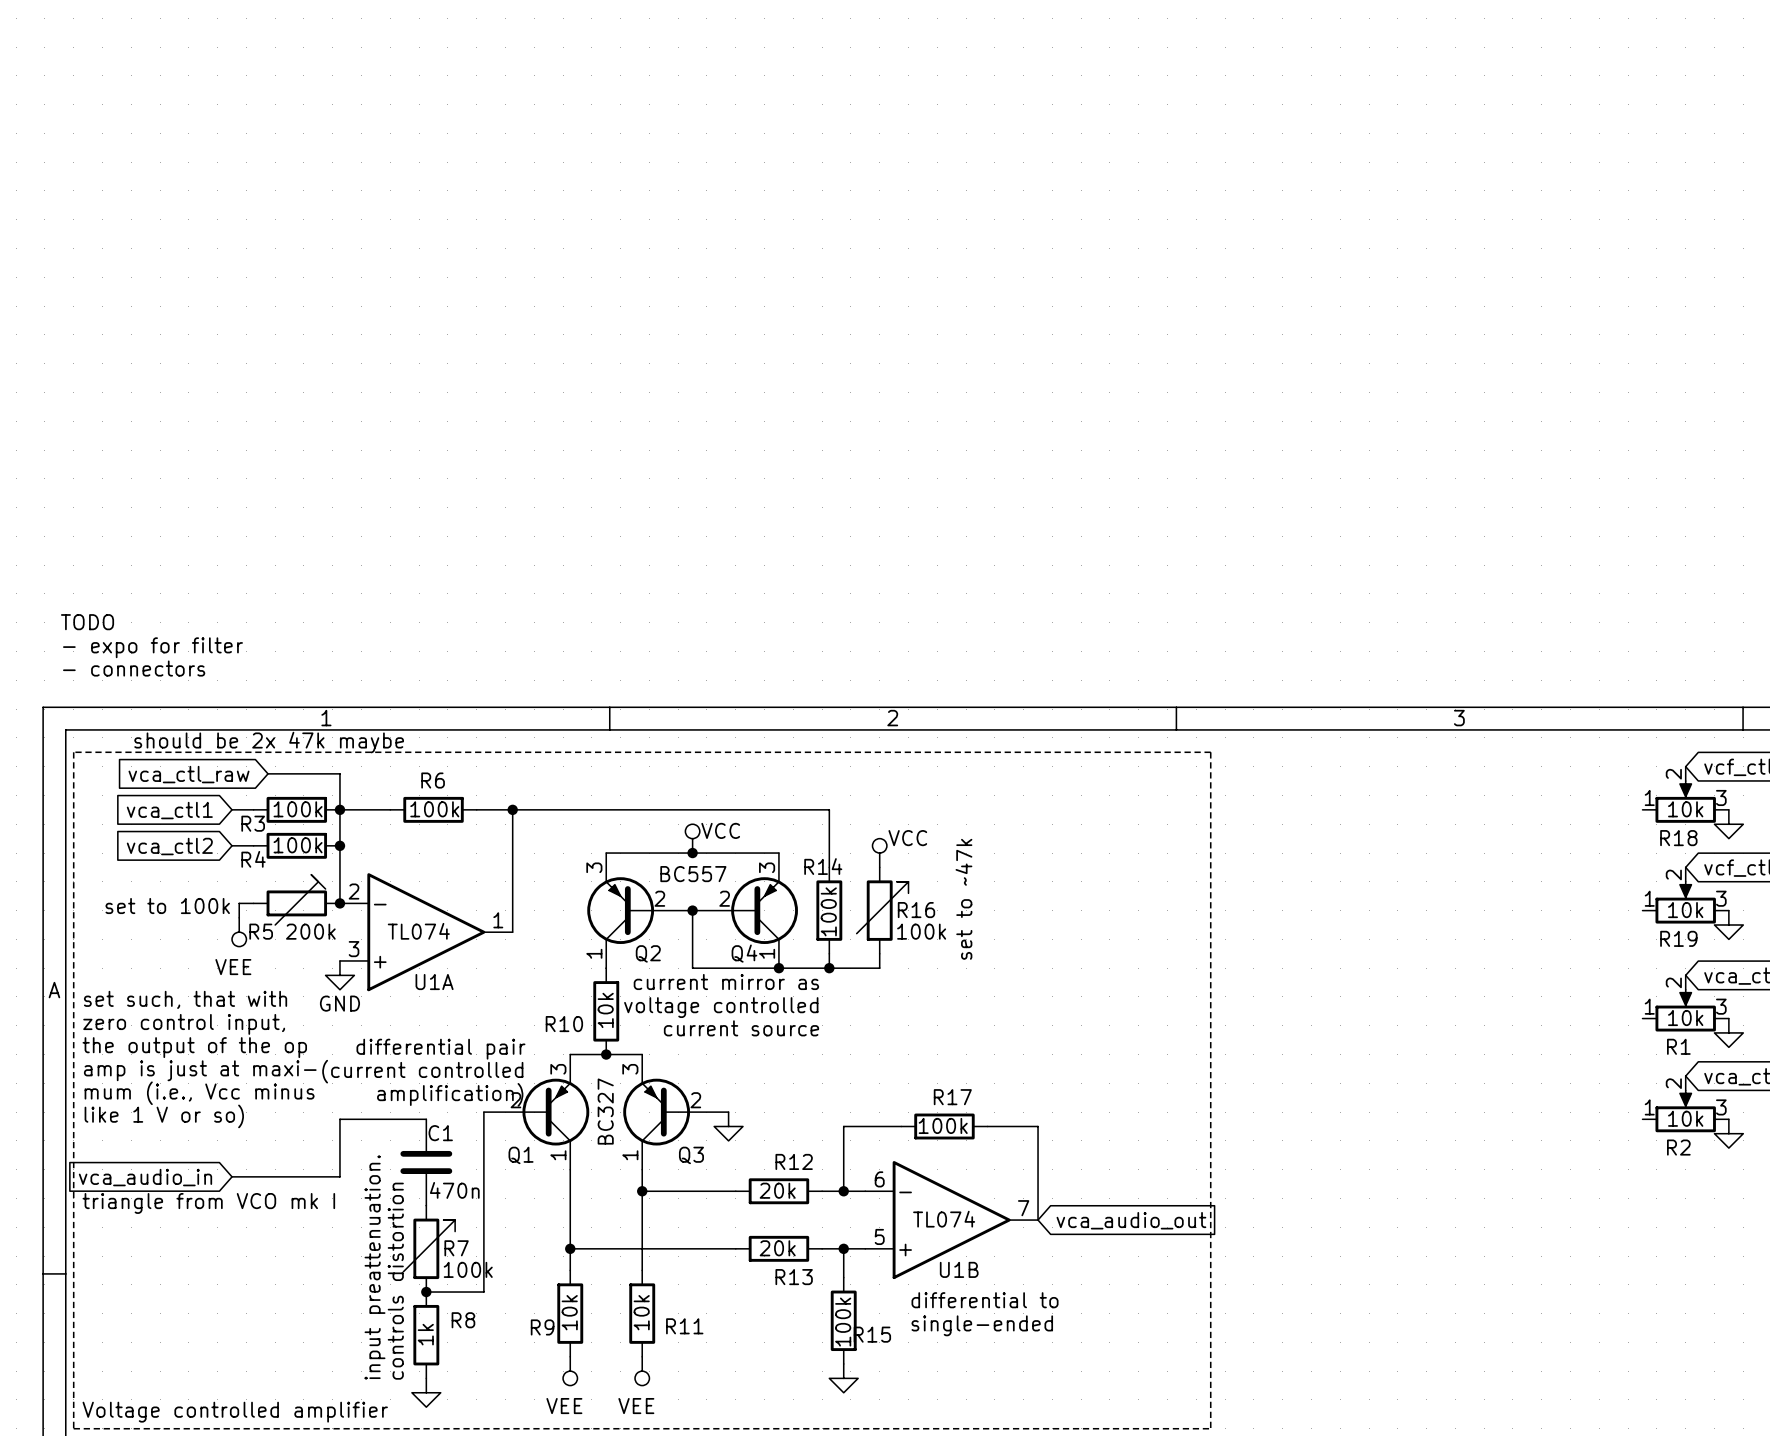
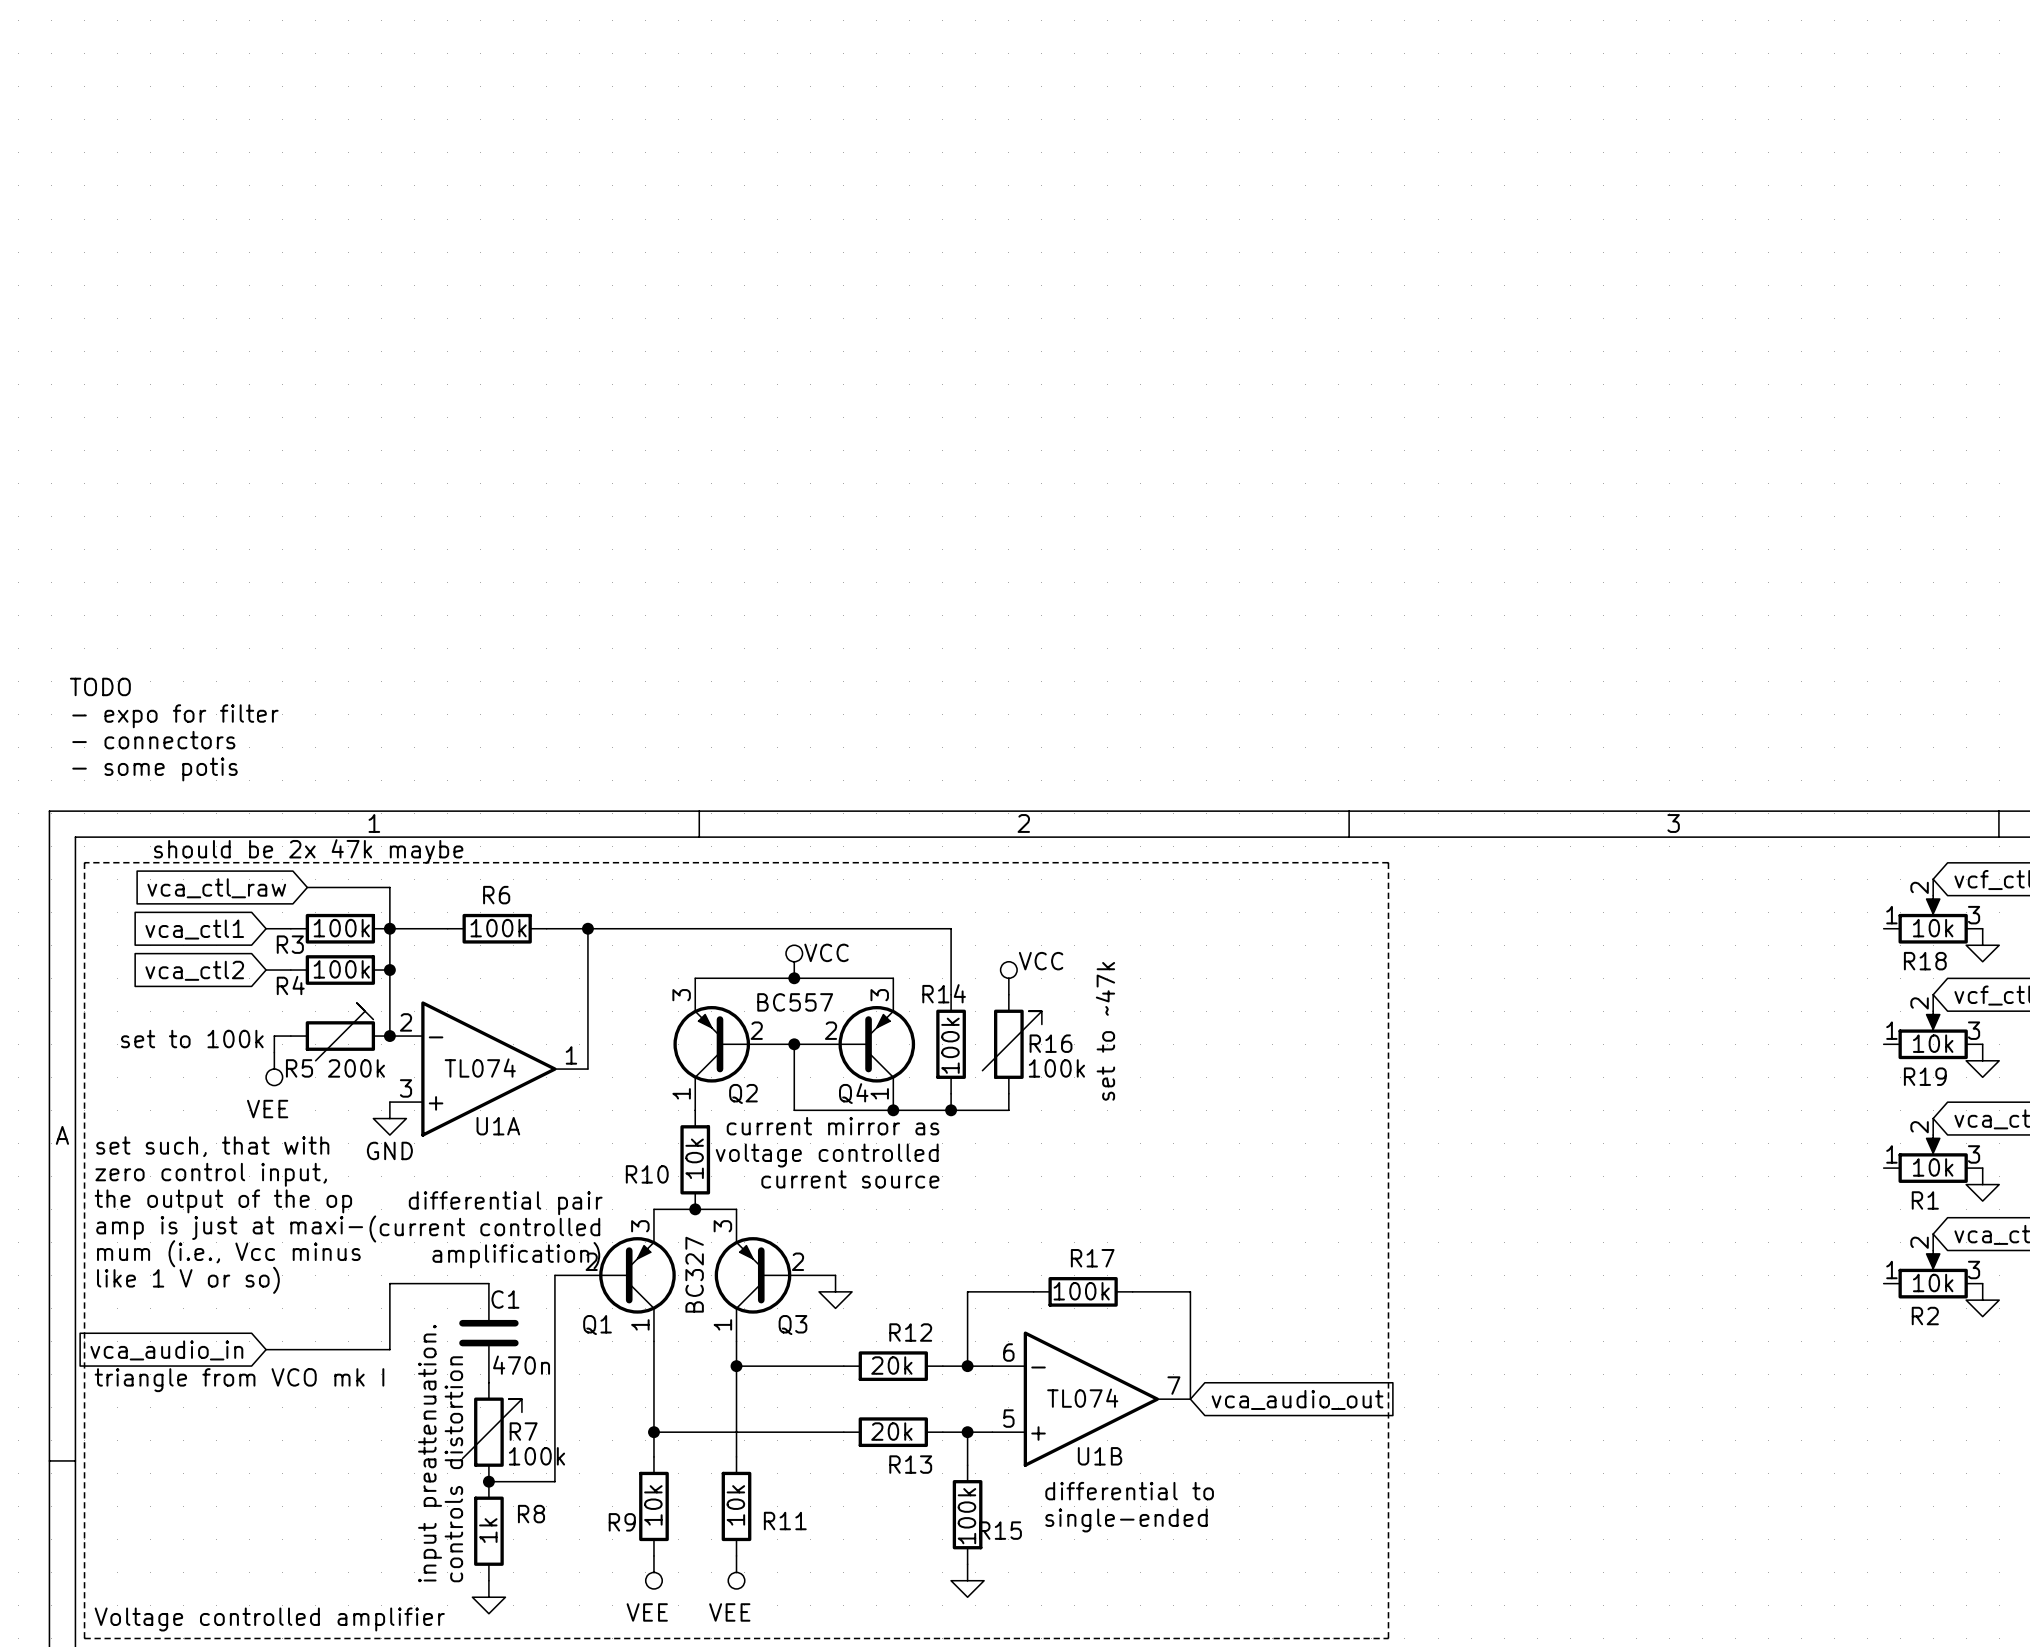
text: none -> TODO (100, 686)
text: TODO (87, 622) -> - expo for filter (175, 716)
text: - expo for filter (152, 647) -> - connectors (153, 740)
text: - connectors (134, 668) -> - some potis (155, 769)

